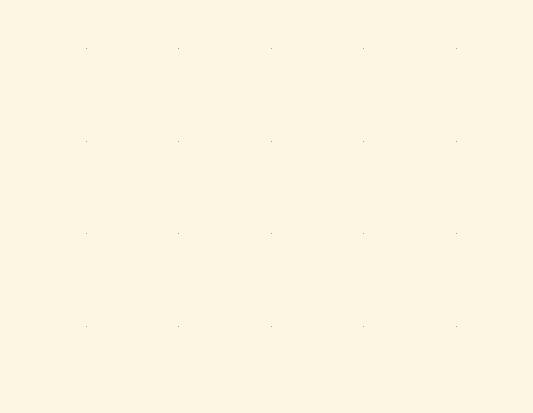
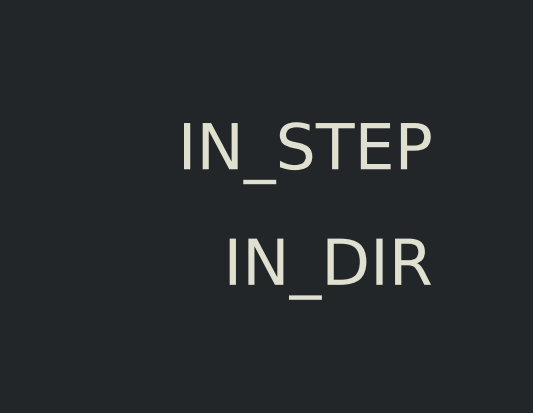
label: none -> IN_STEP (307, 153)
label: none -> IN_DIR (330, 269)

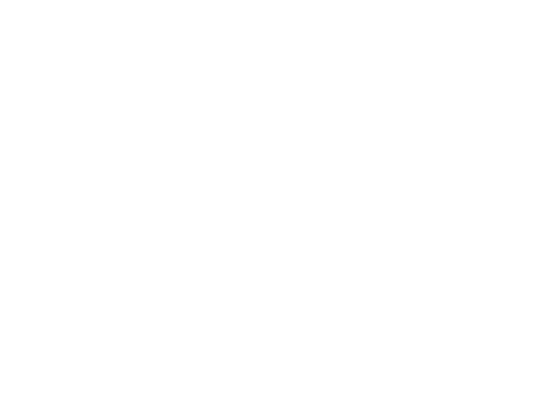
label: IN_STEP (307, 153) -> none
label: IN_DIR (330, 269) -> none

